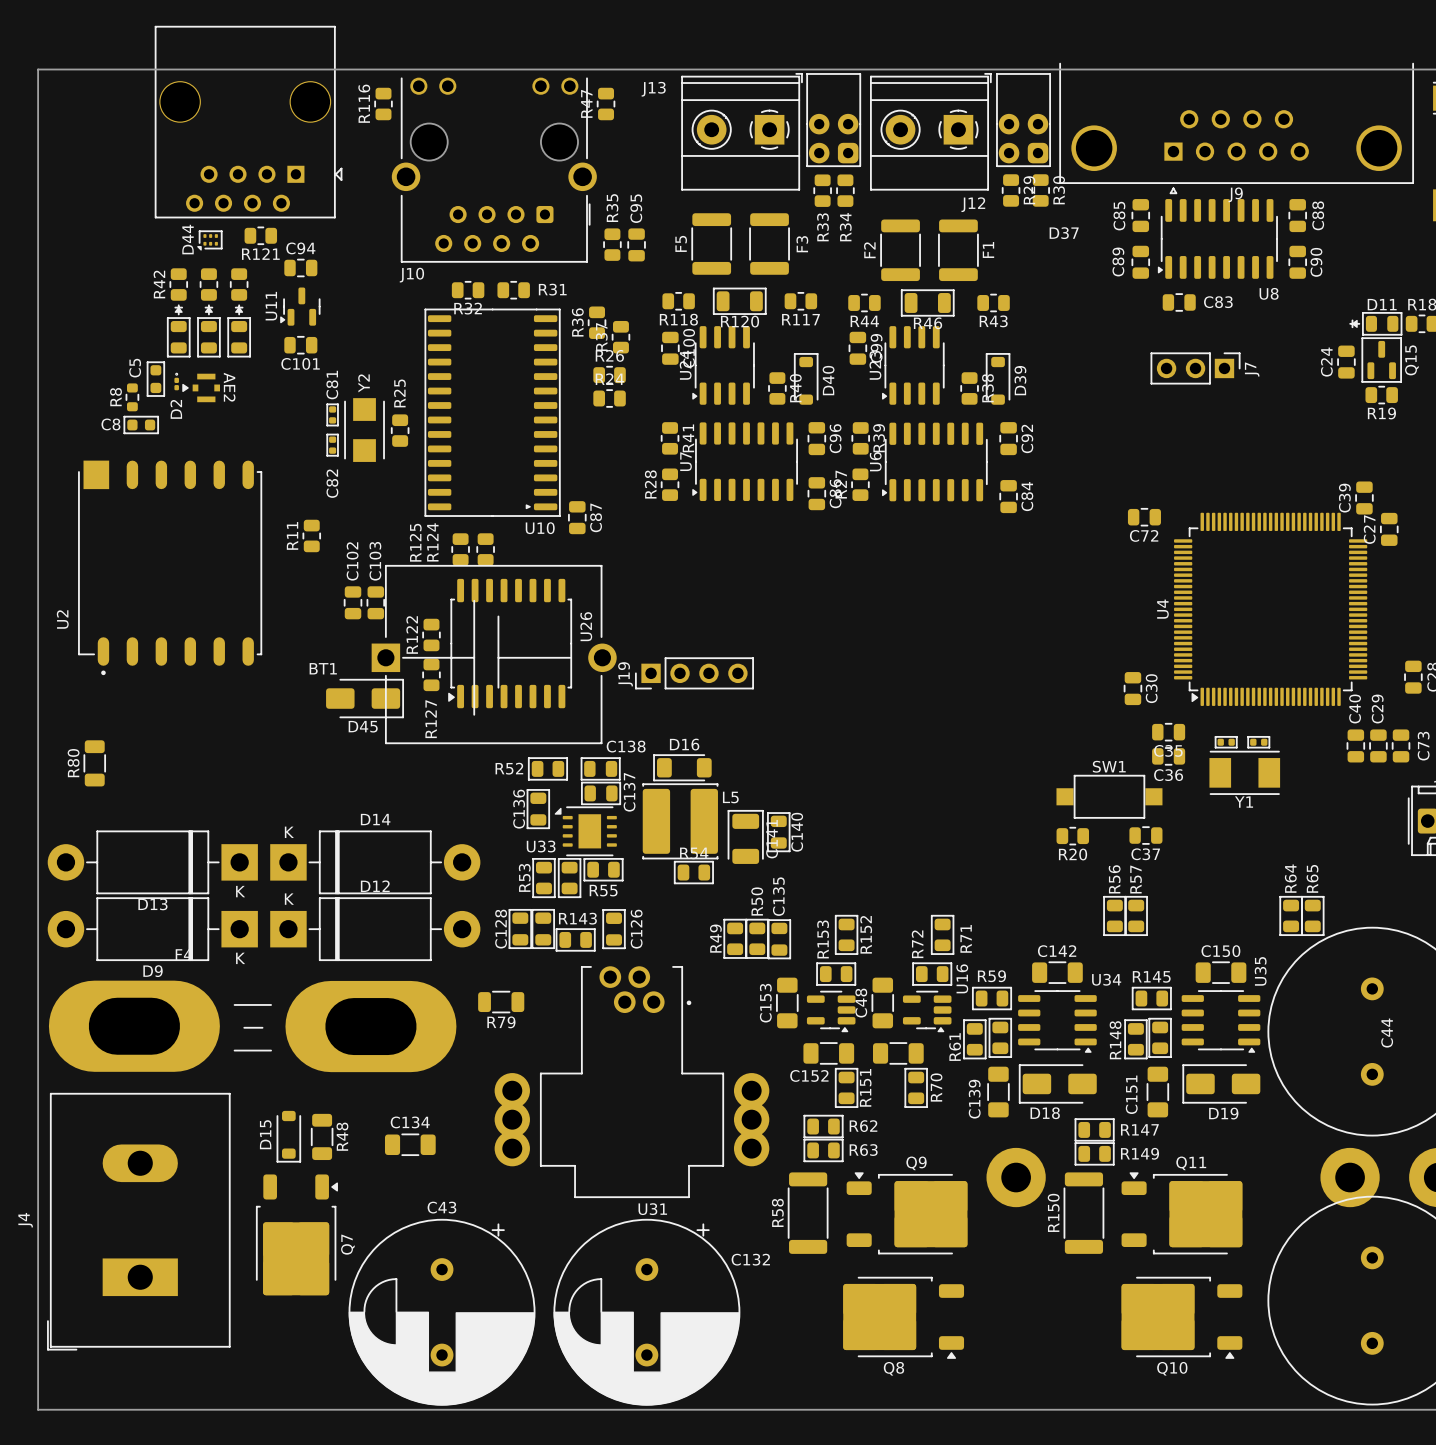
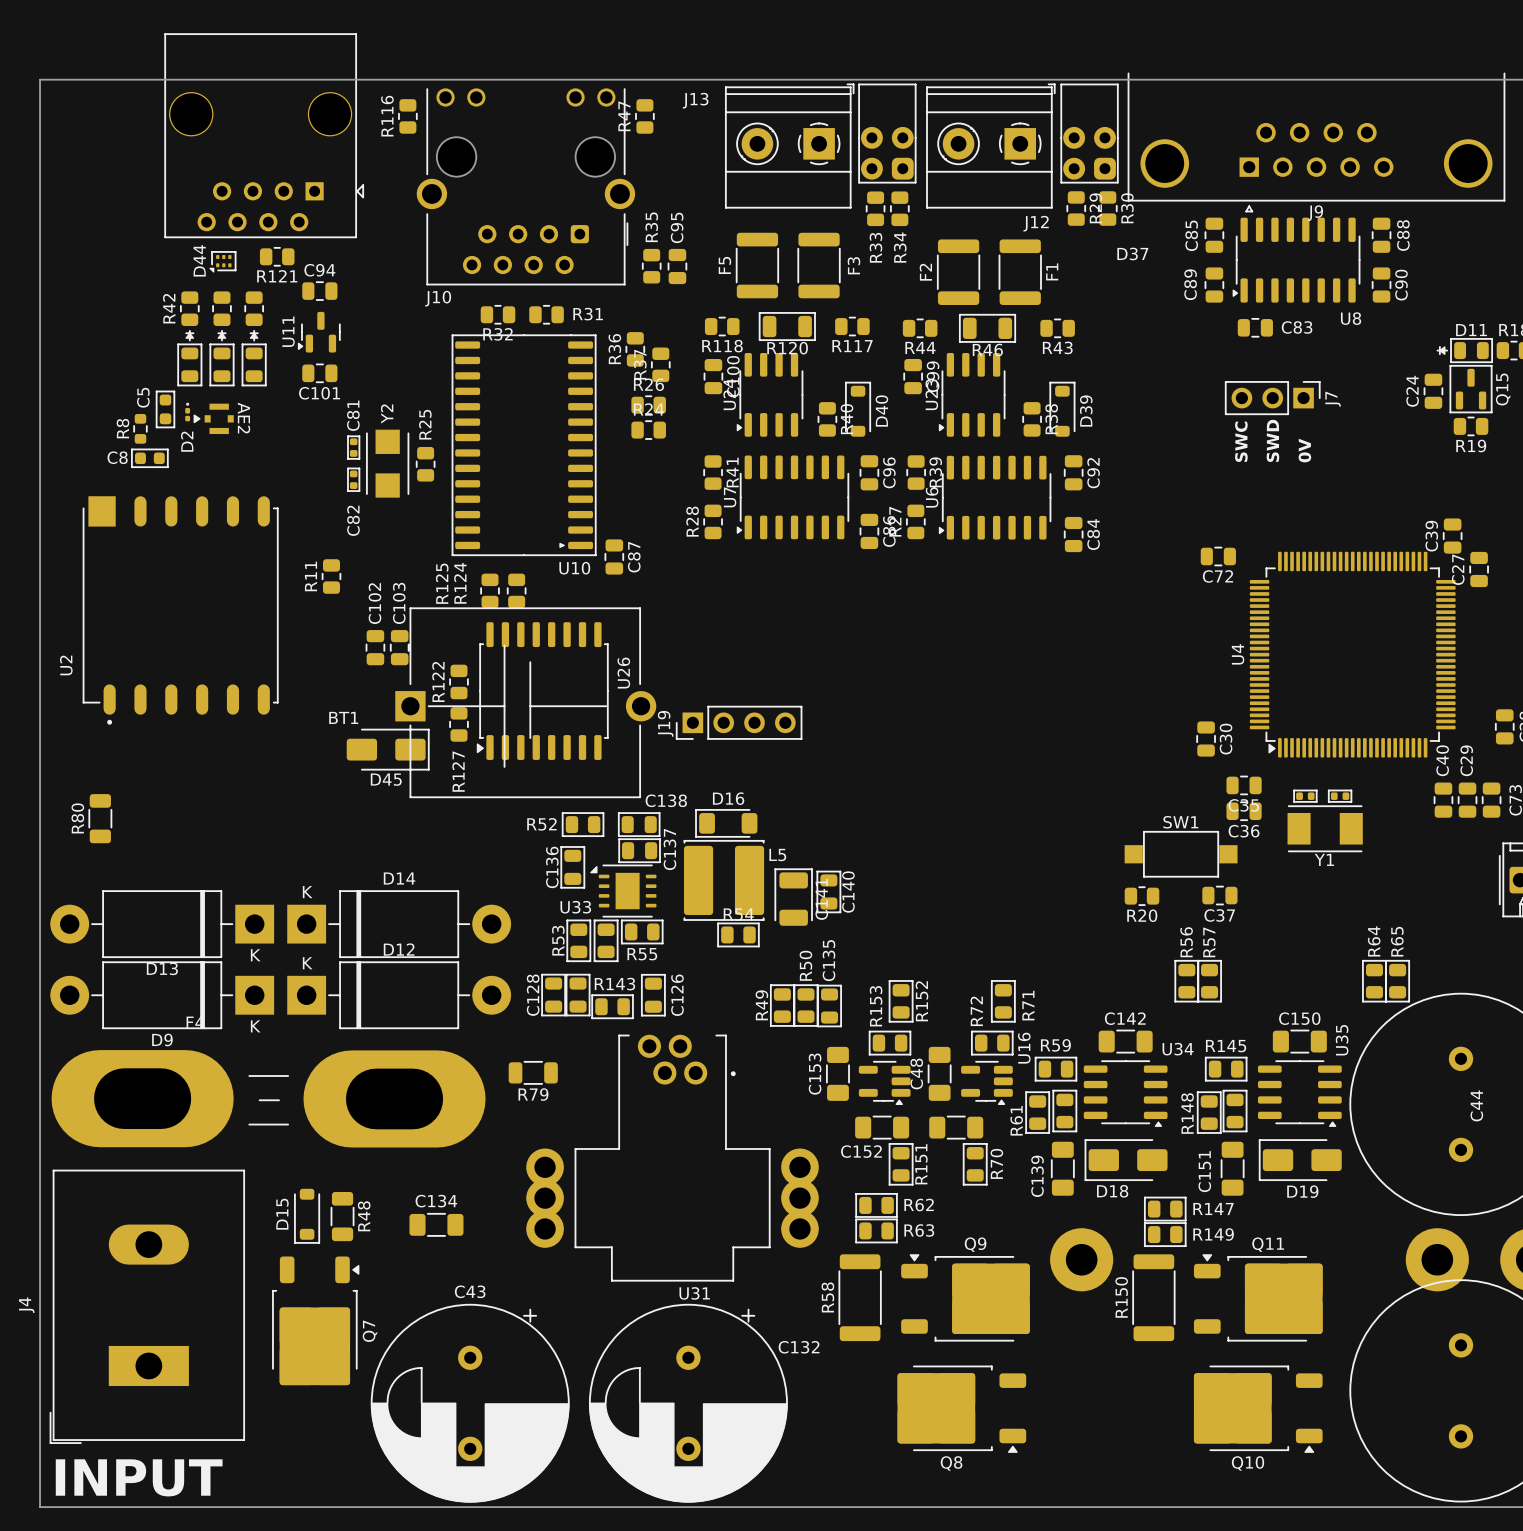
text: none -> SWD (1272, 440)
text: none -> SWC (1241, 441)
text: none -> 0V (1304, 450)
text: none -> INPUT (139, 1477)

